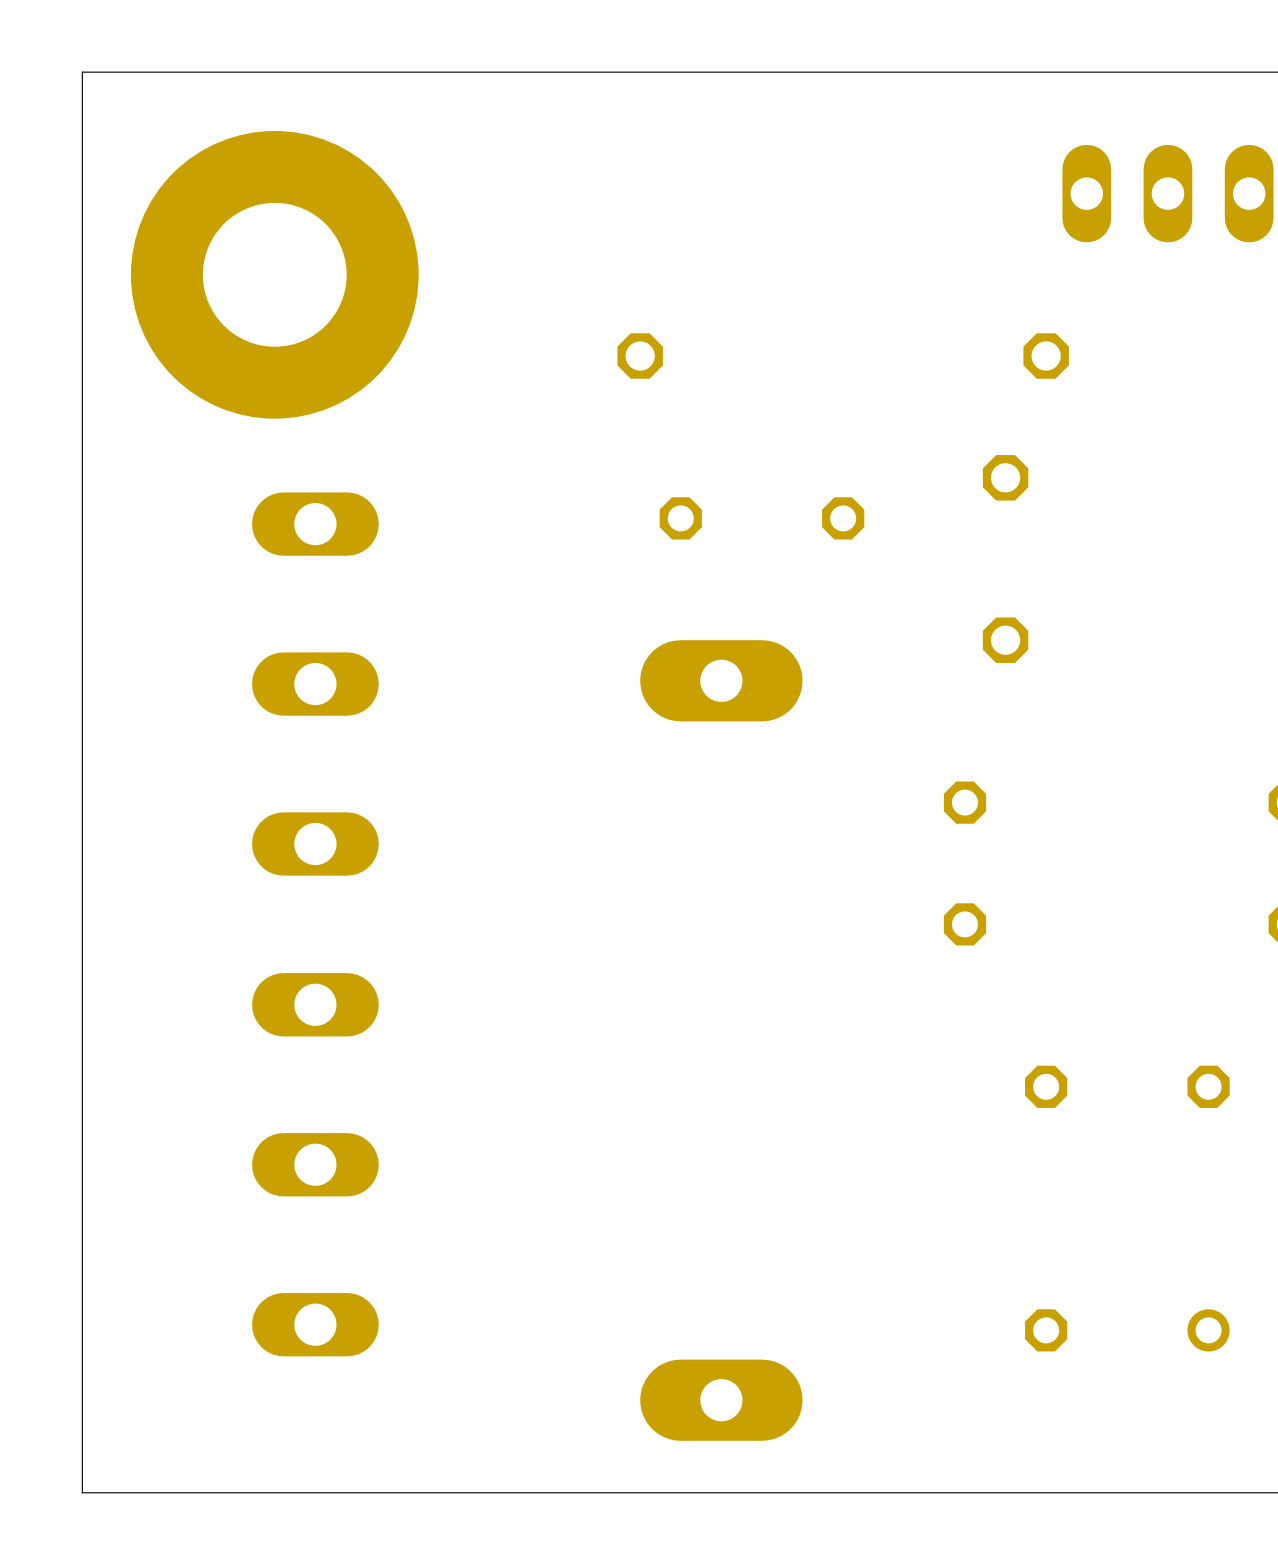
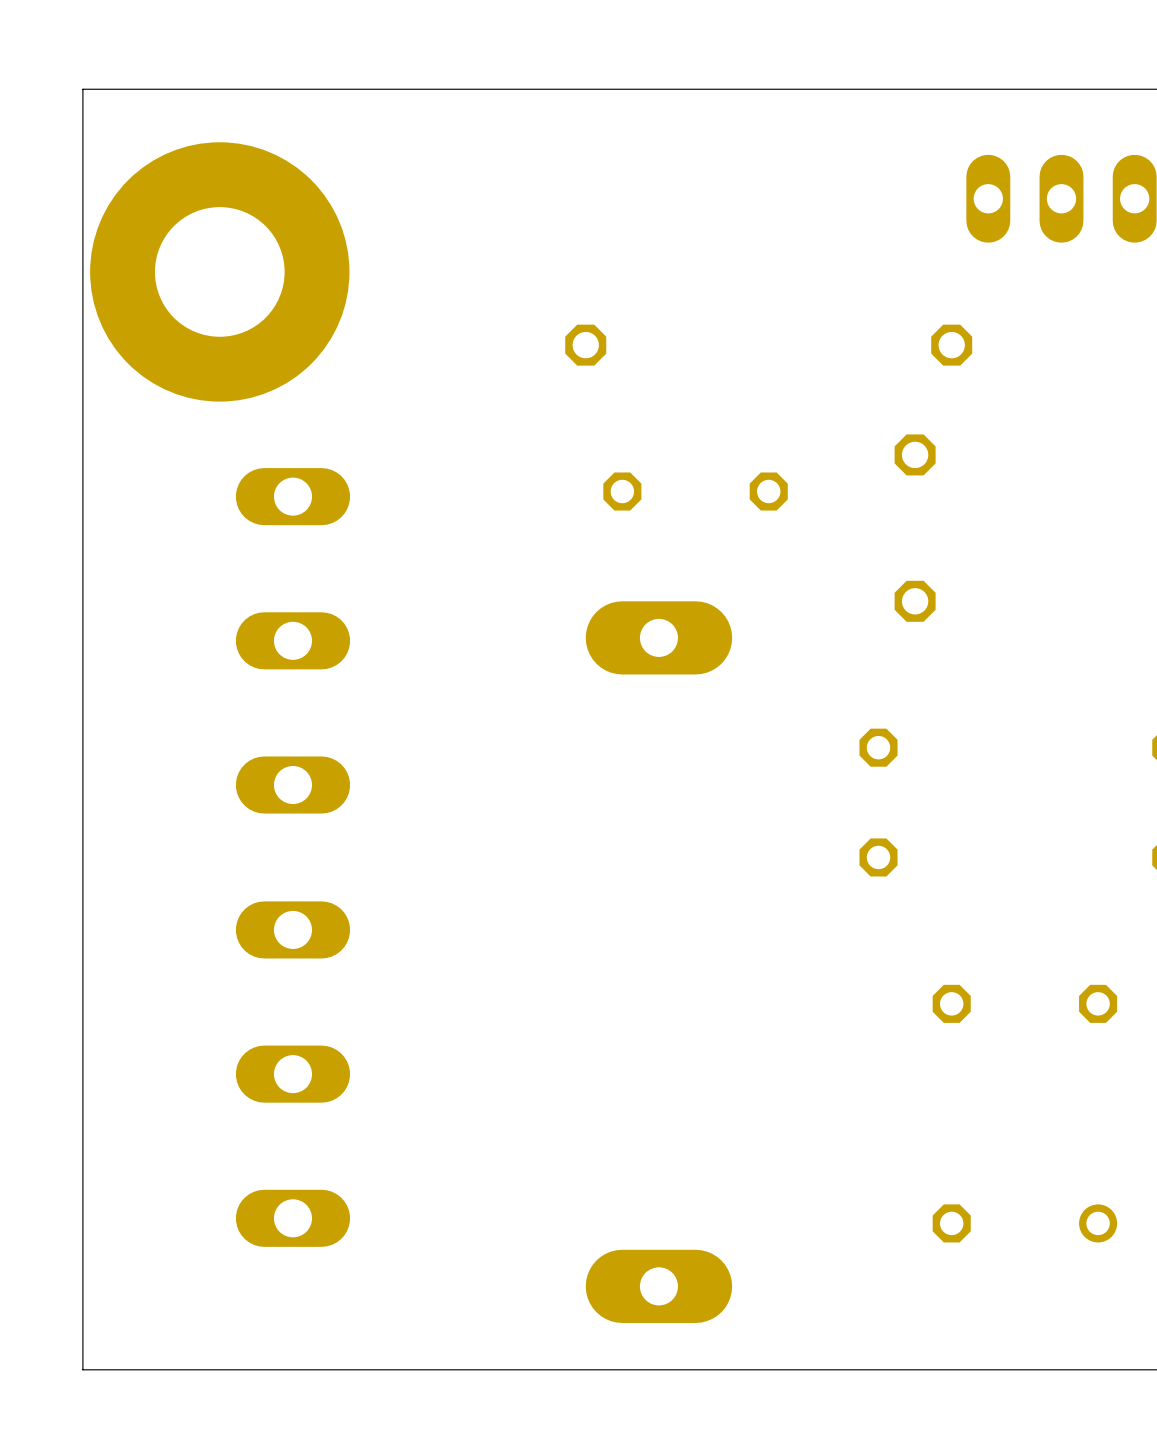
part position: (274, 274) -> (219, 271)

